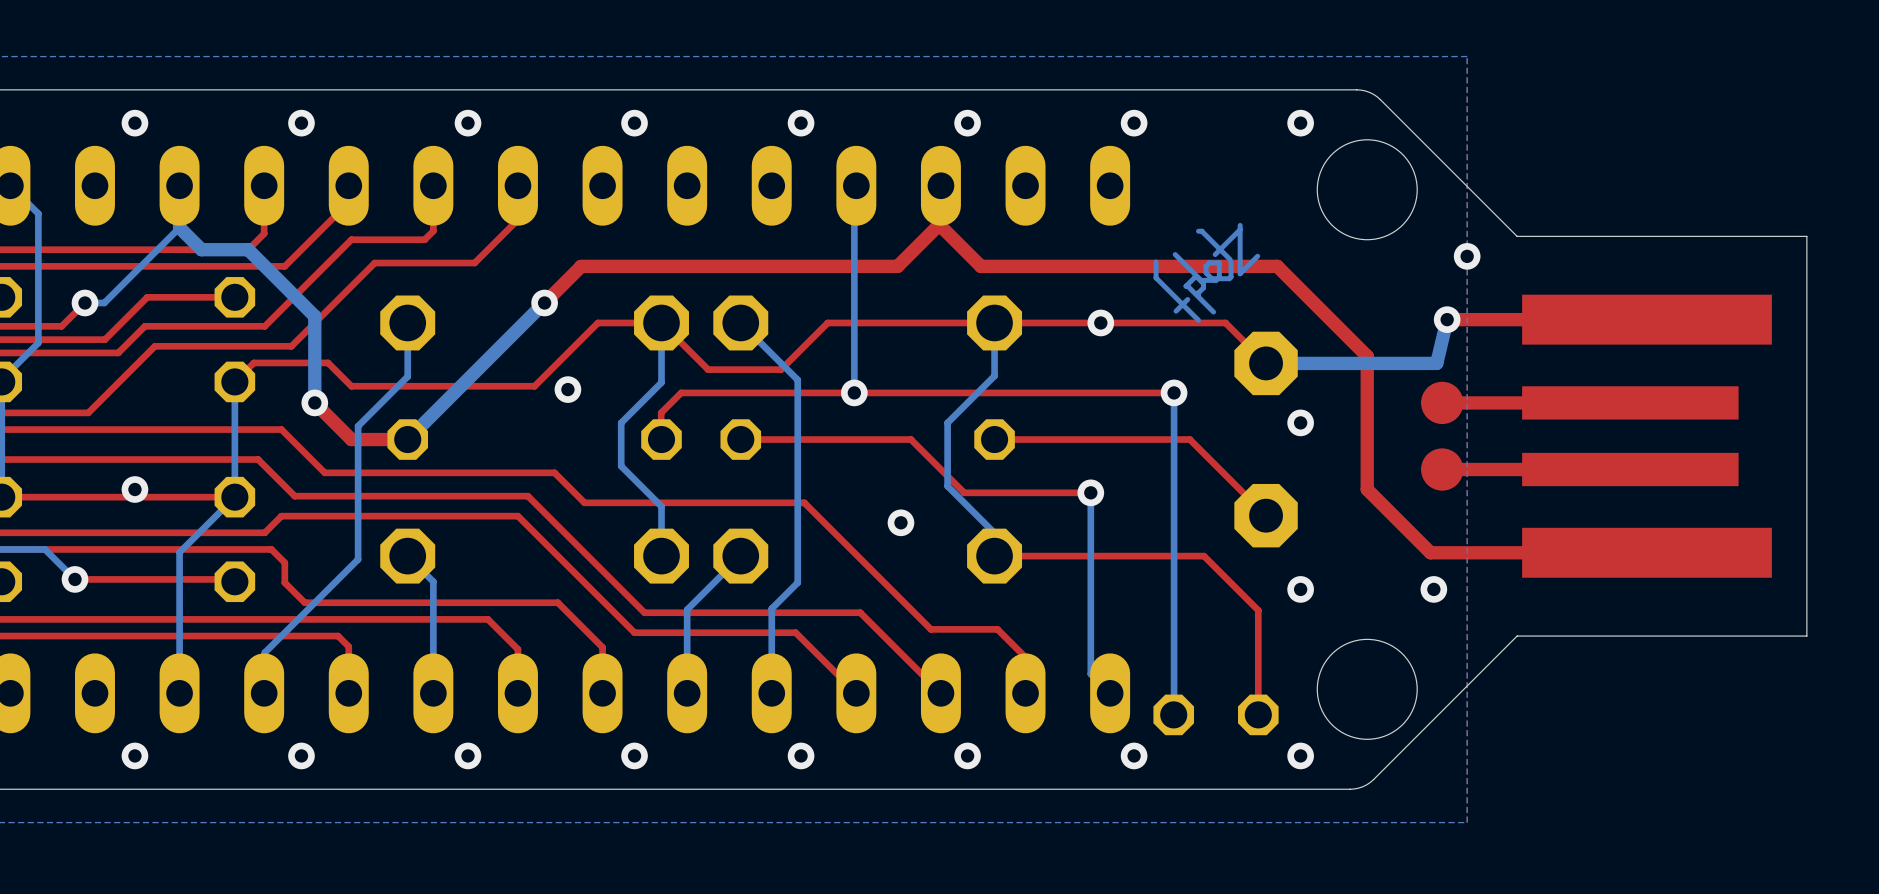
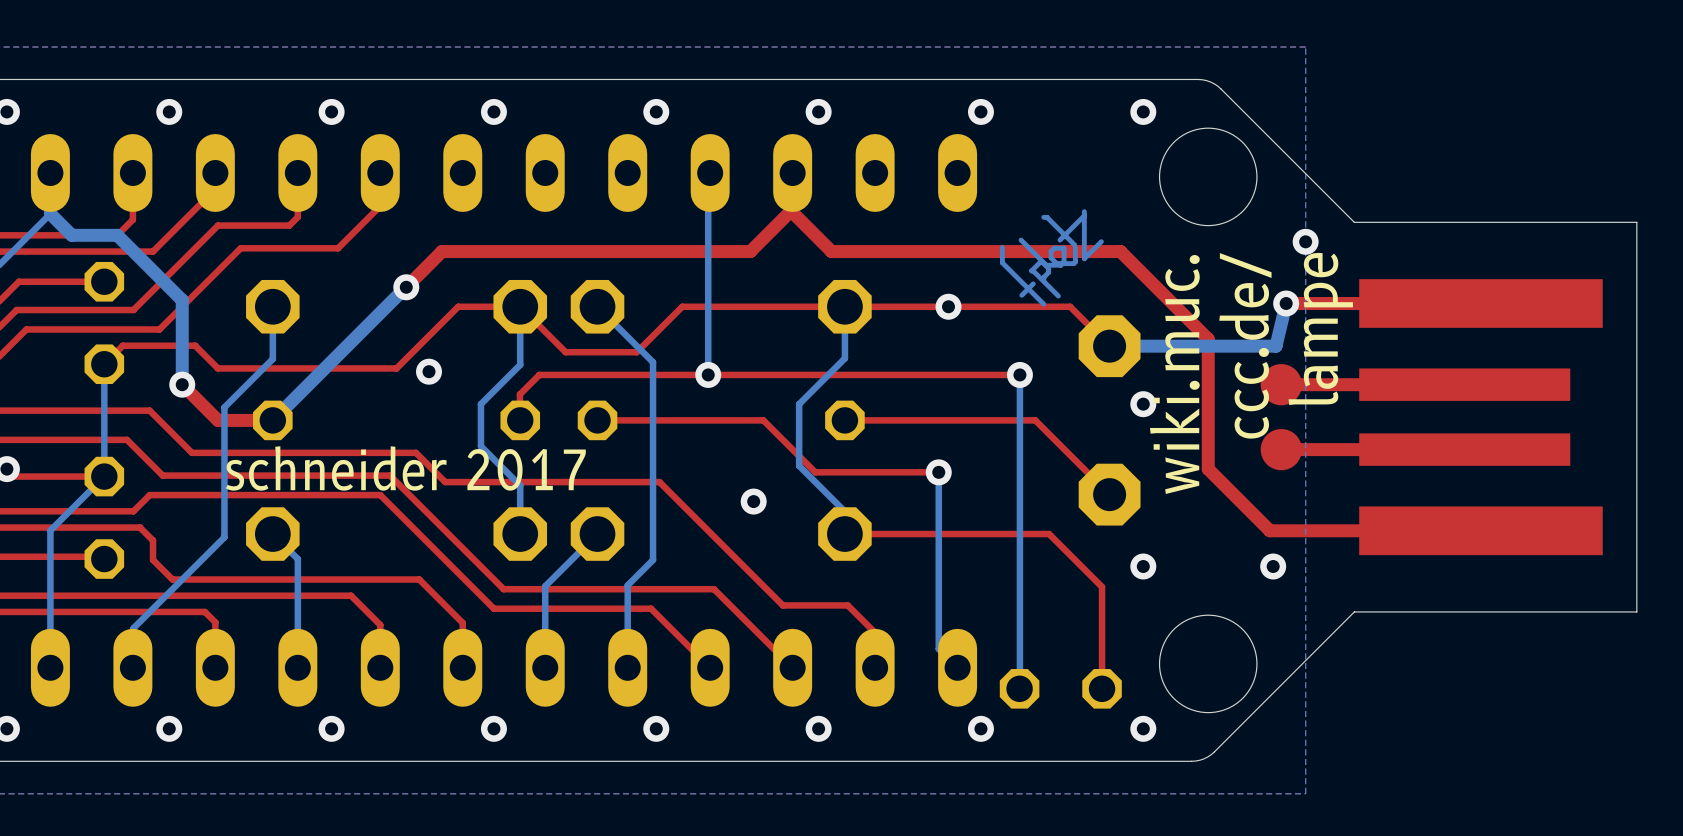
text: none -> lampe (1320, 328)
text: none -> ccc.de/ (1245, 345)
text: none -> wiki.muc. (1174, 374)
text: none -> schneider 2017 (405, 468)

